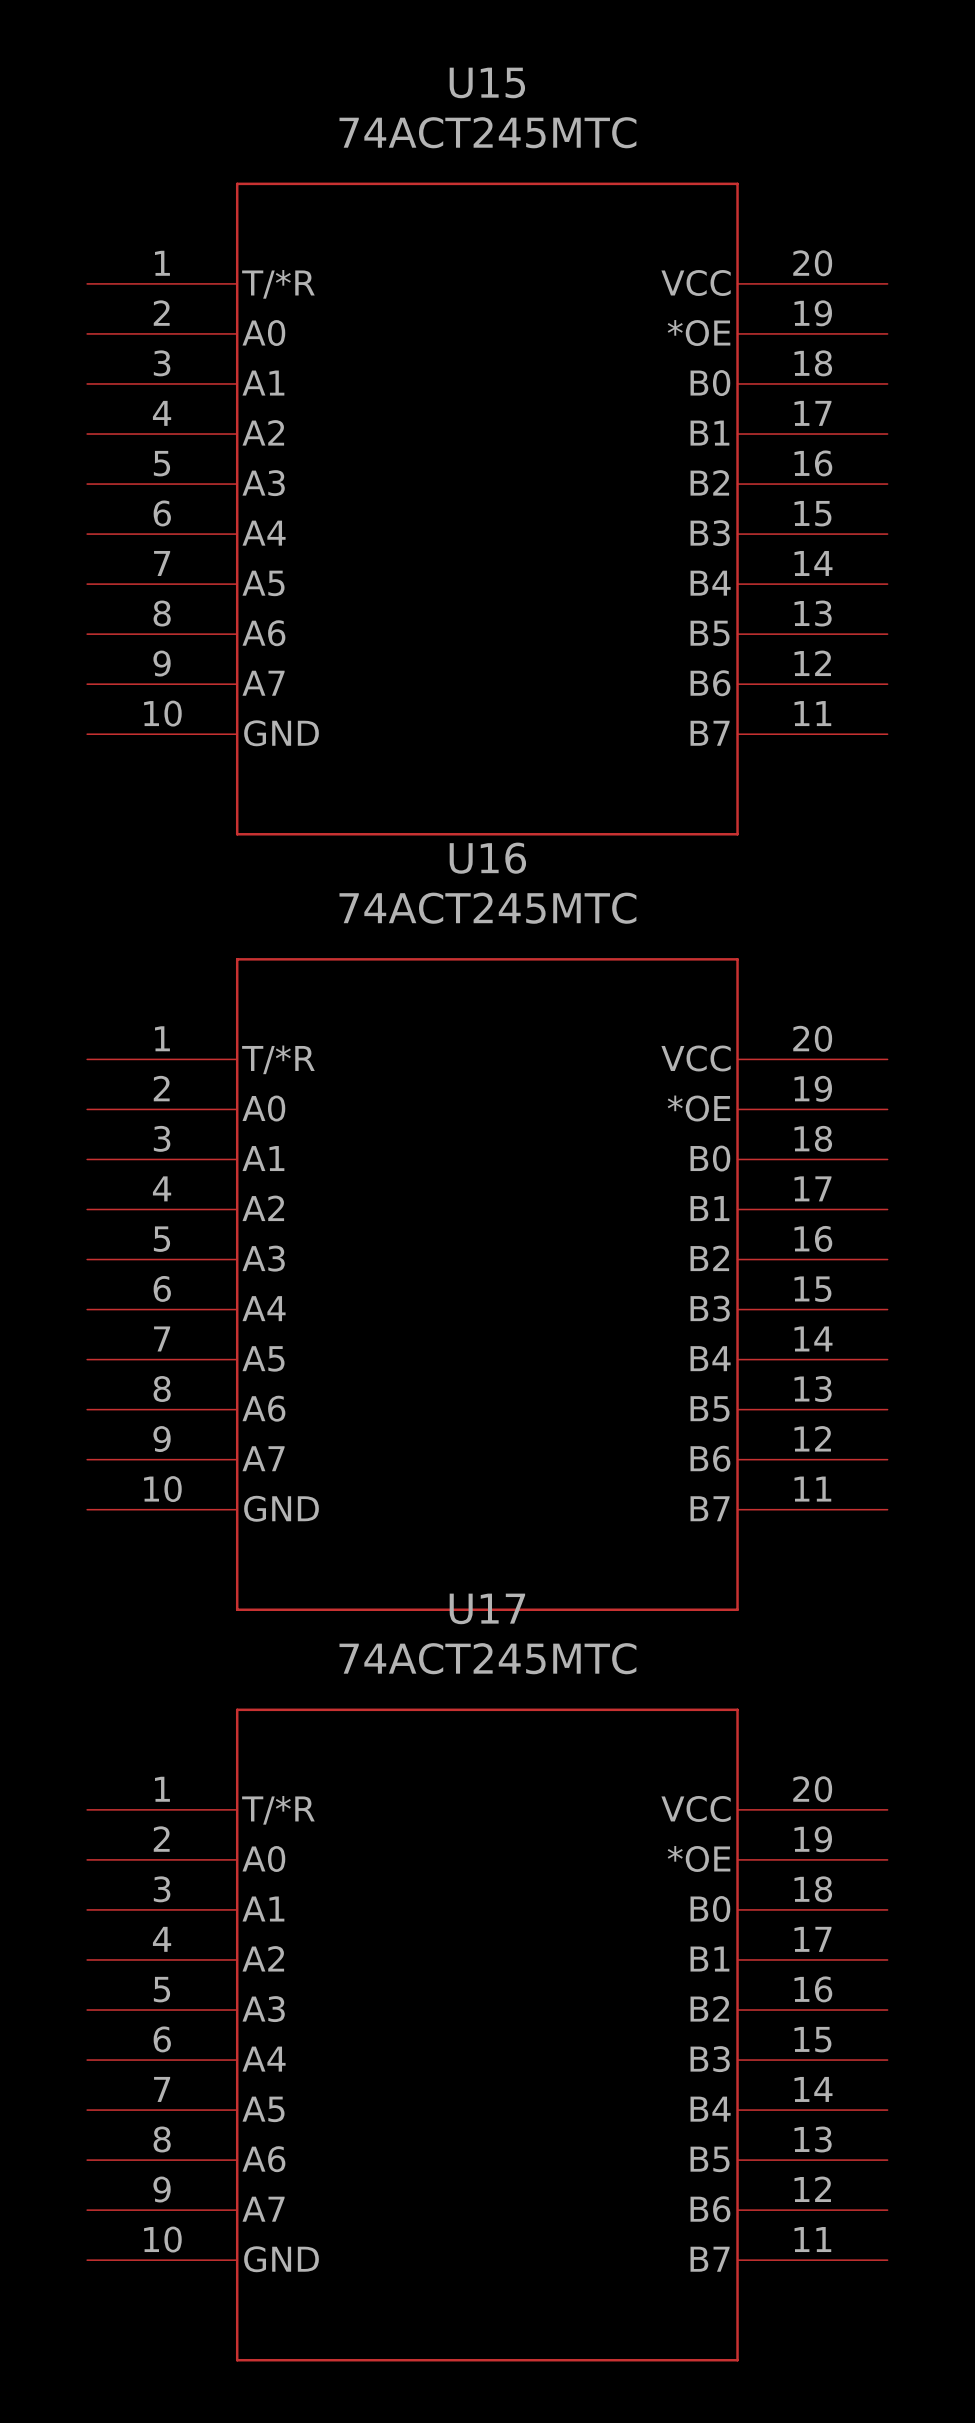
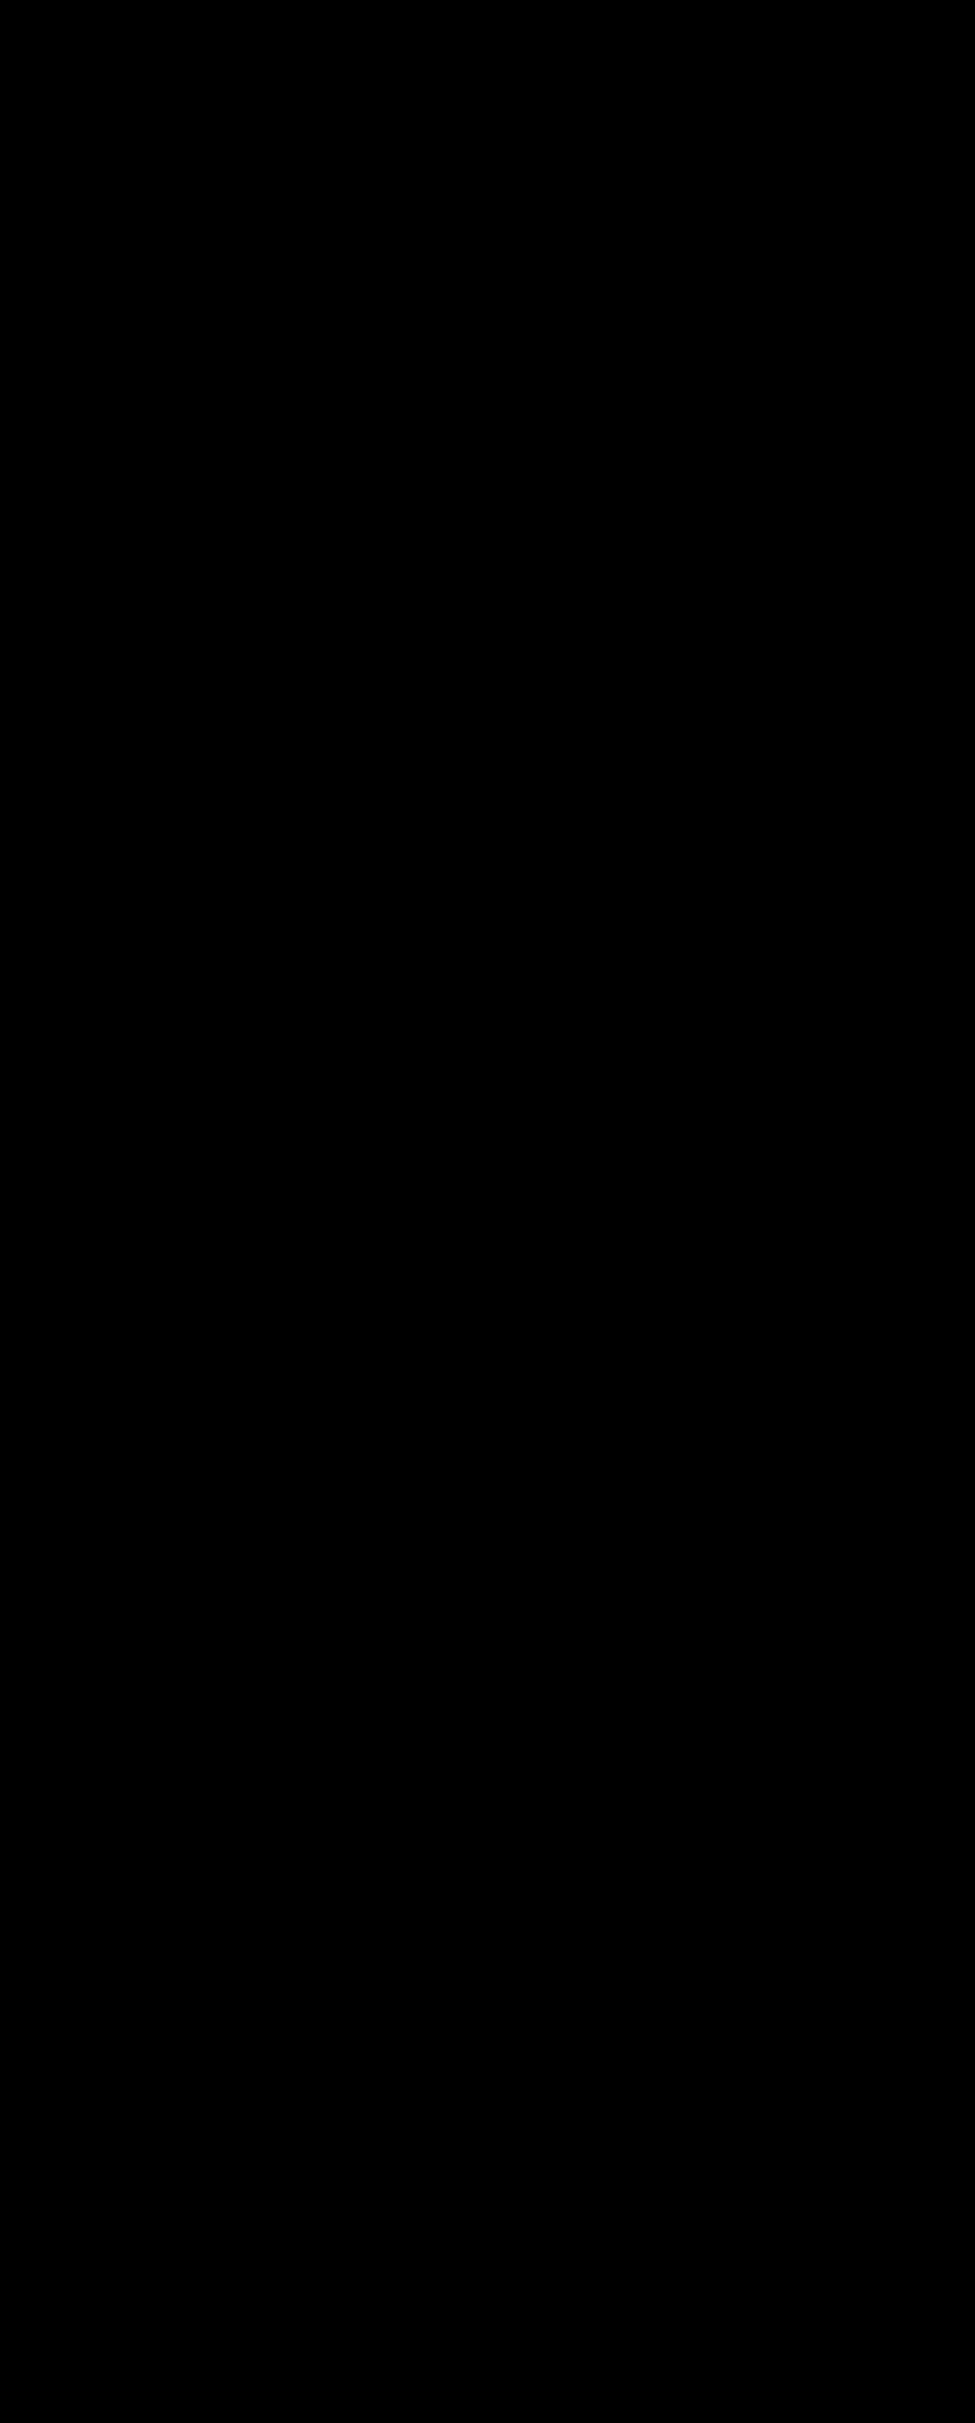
U15: 74ACT245MTC (487, 509) -> none
U16: 74ACT245MTC (487, 1284) -> none
U17: 74ACT245MTC (487, 2035) -> none

